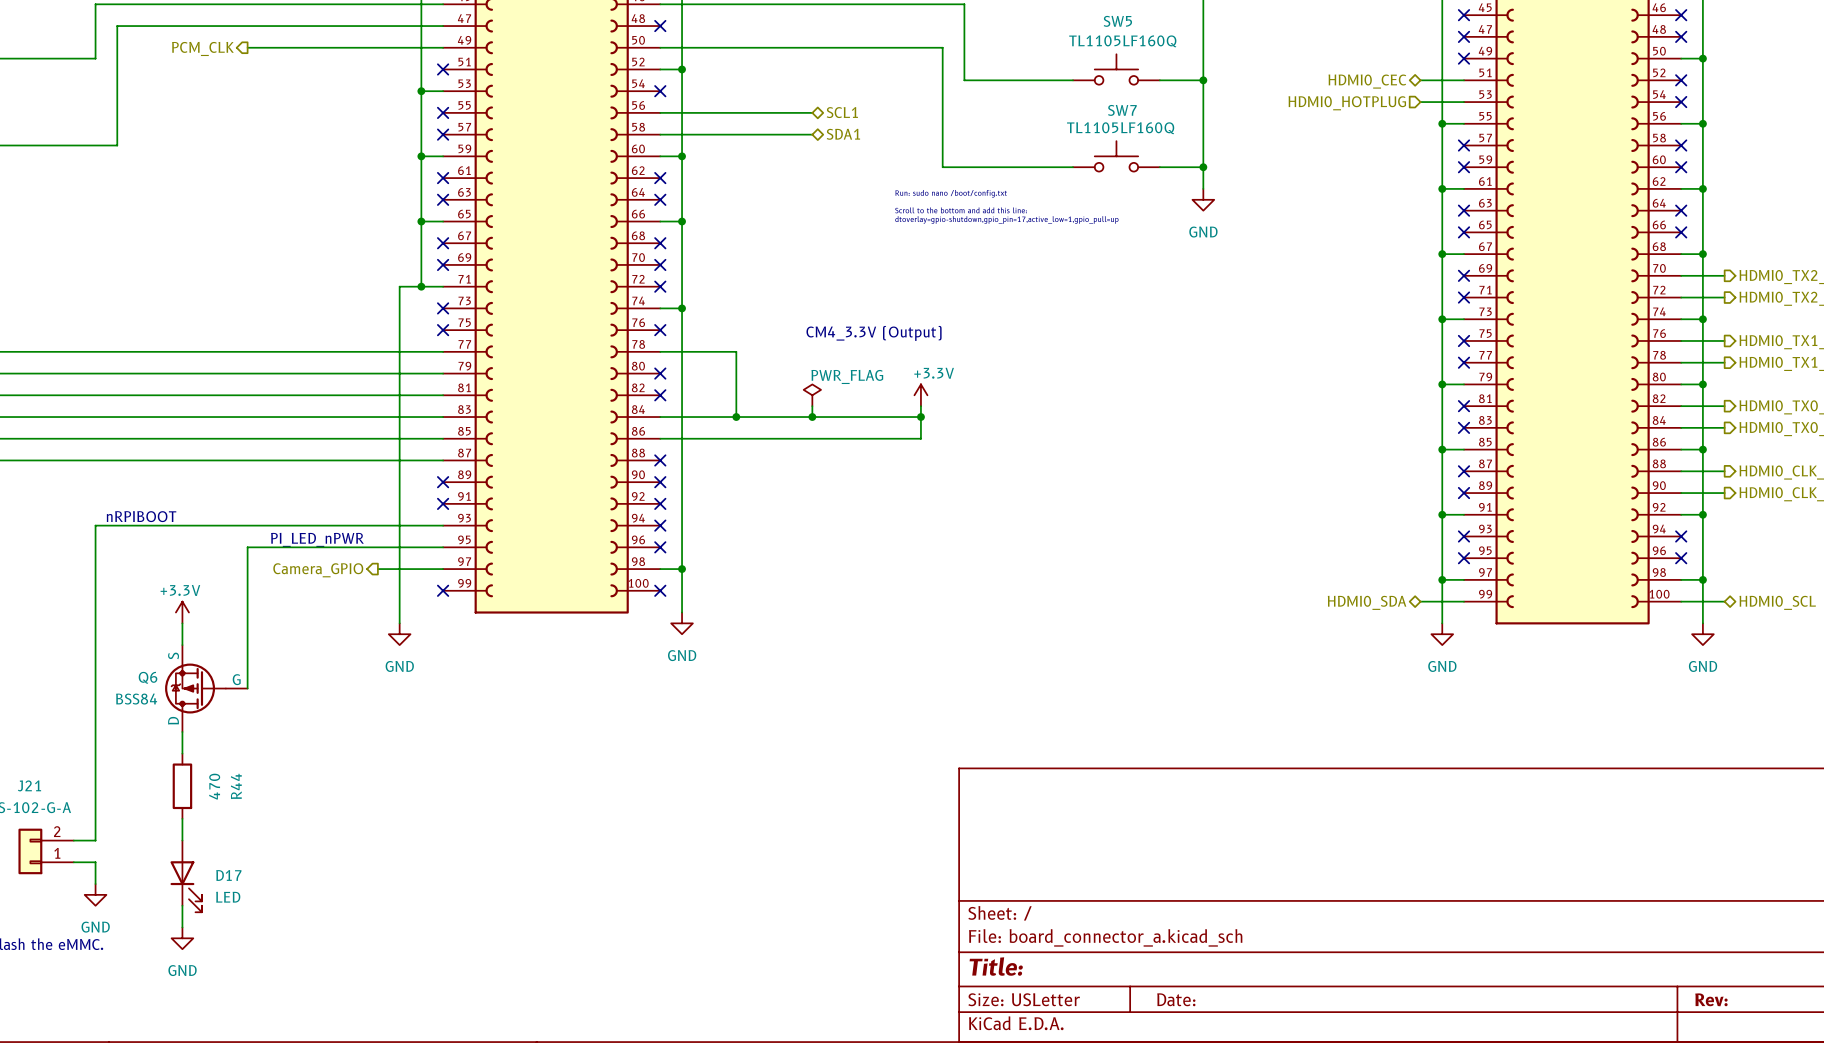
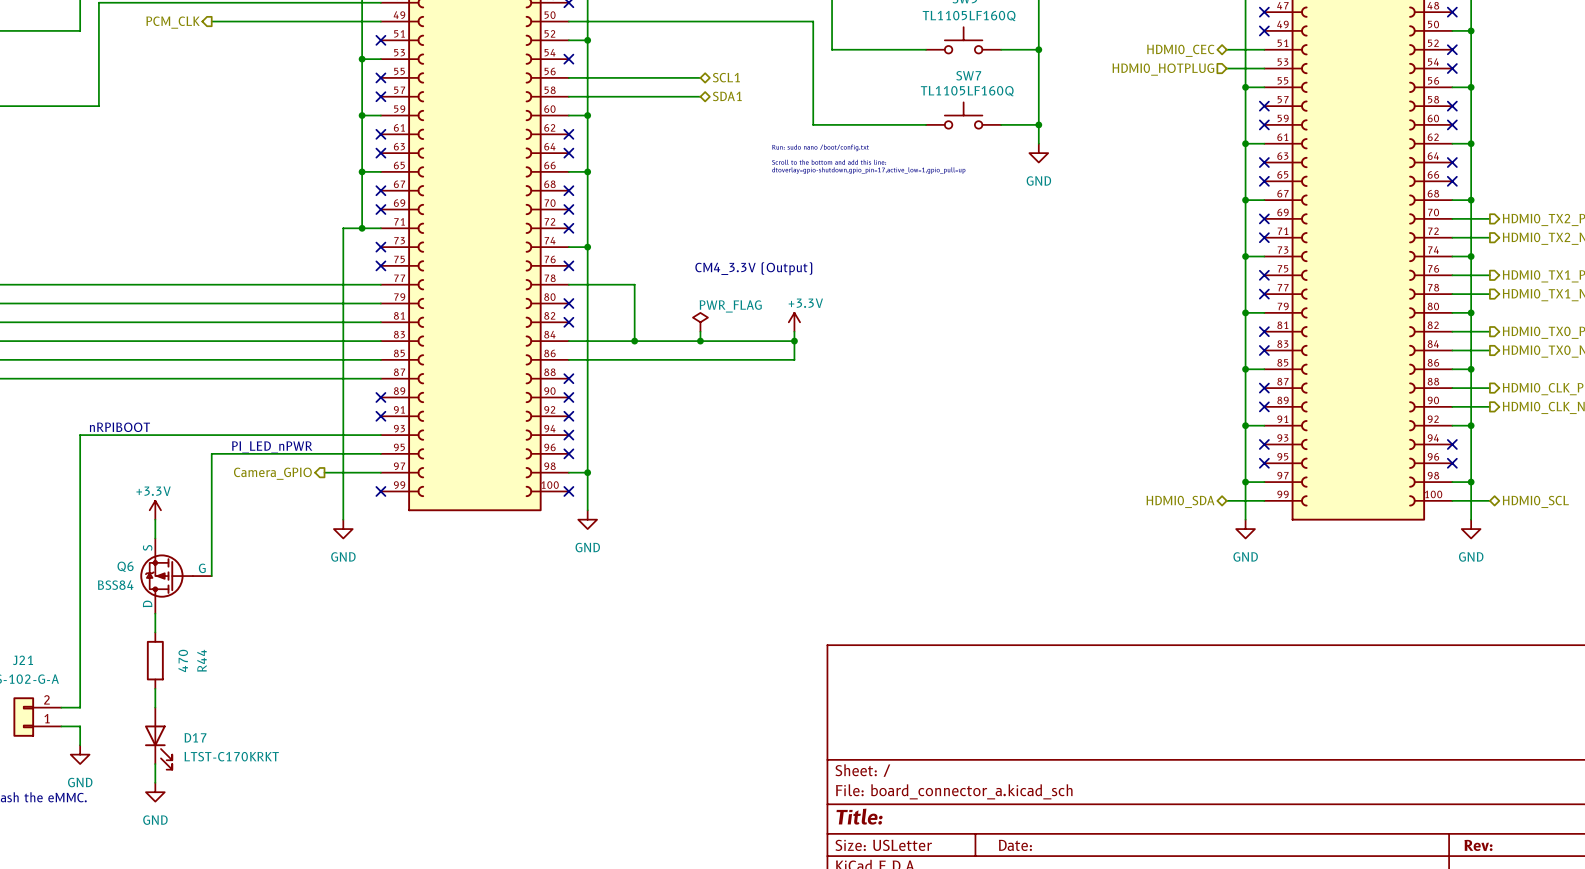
D17 value: LED (228, 897) -> LTST-C170KRKT (231, 756)

